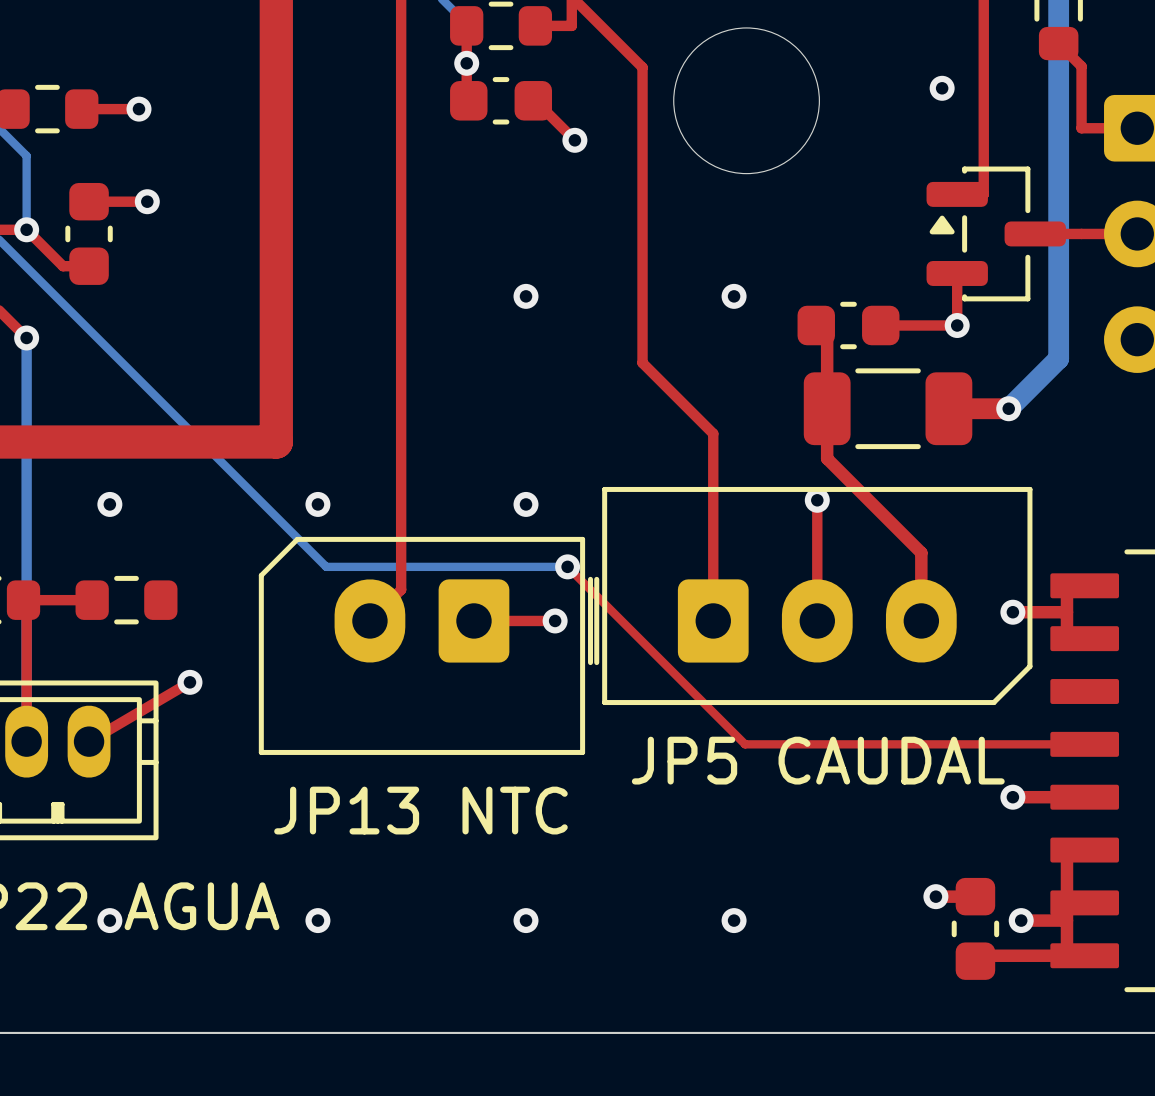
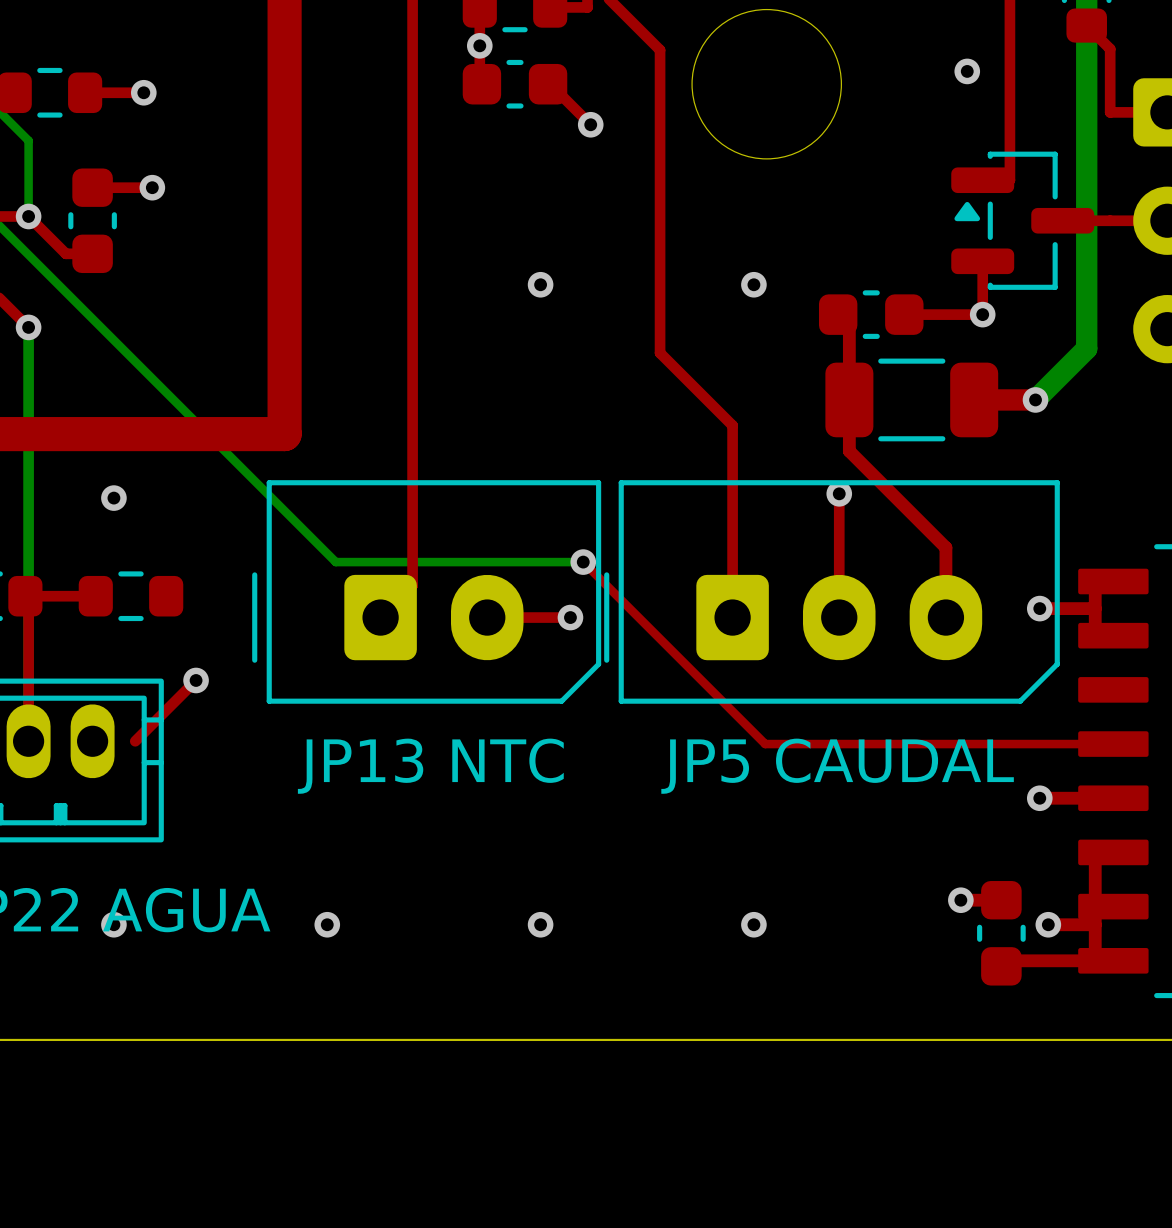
via: (317, 504) -> none
via: (526, 504) -> none
part rotation: 0° (429, 645) -> 180° (426, 591)
top track: (189, 682) (89, 741) -> (196, 680) (135, 741)
text position: JP13 NTC (420, 810) -> JP13 NTC (430, 766)

